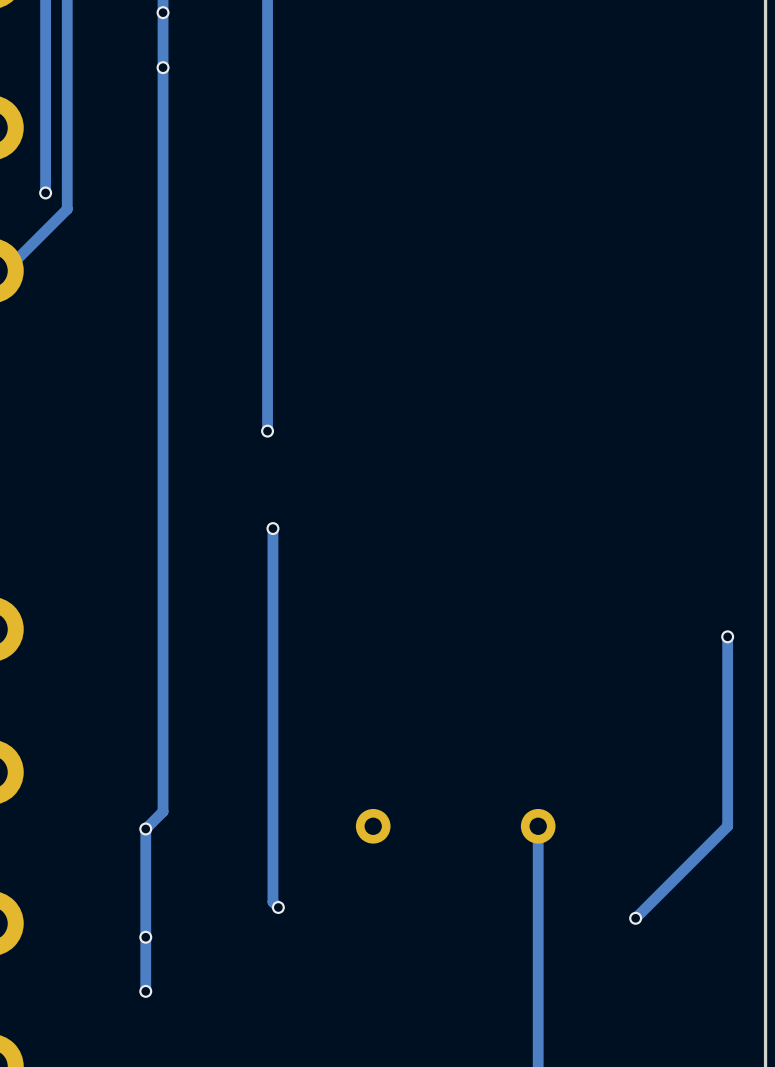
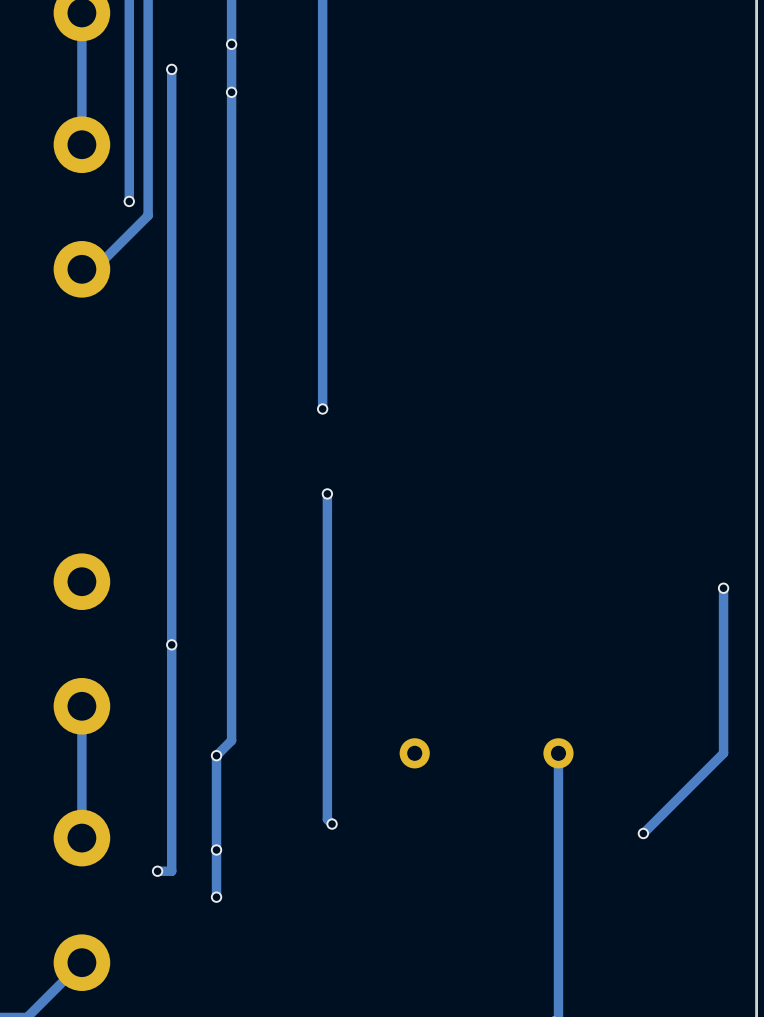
track: none -> (171, 69) (171, 871) (157, 871)
via: none -> (171, 69)
via: none -> (171, 644)
via: none -> (157, 871)

